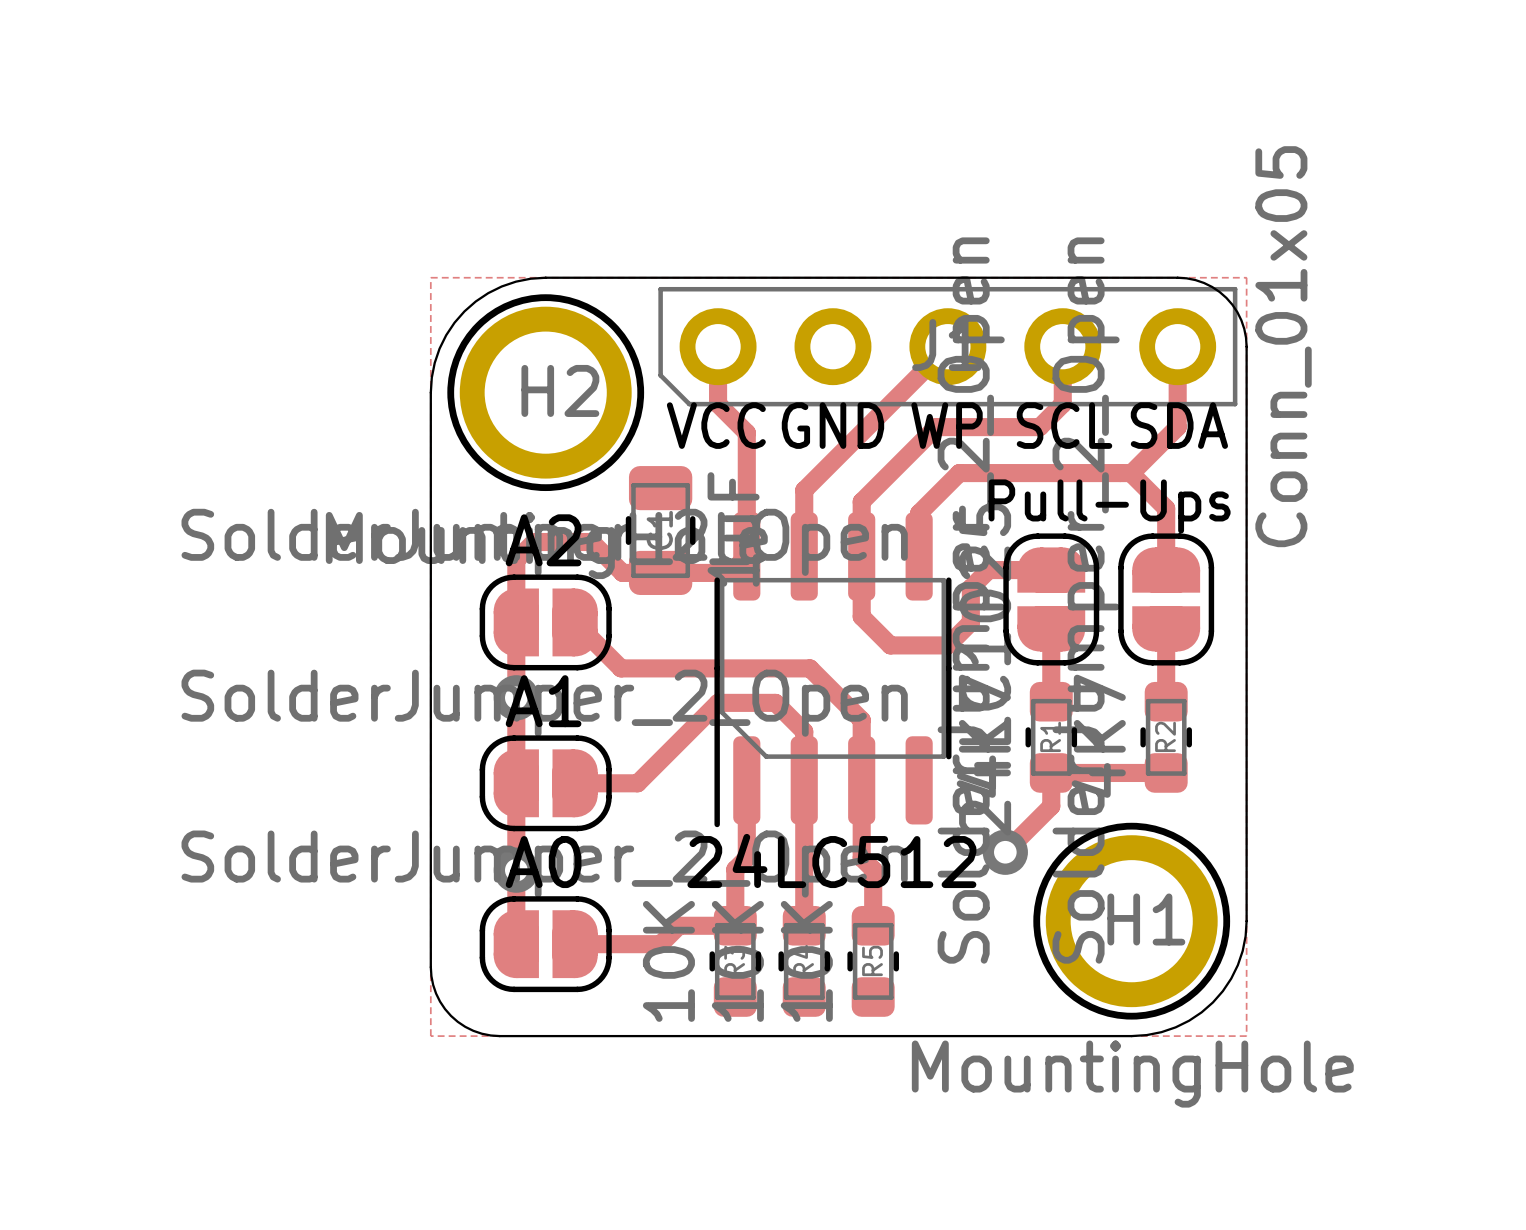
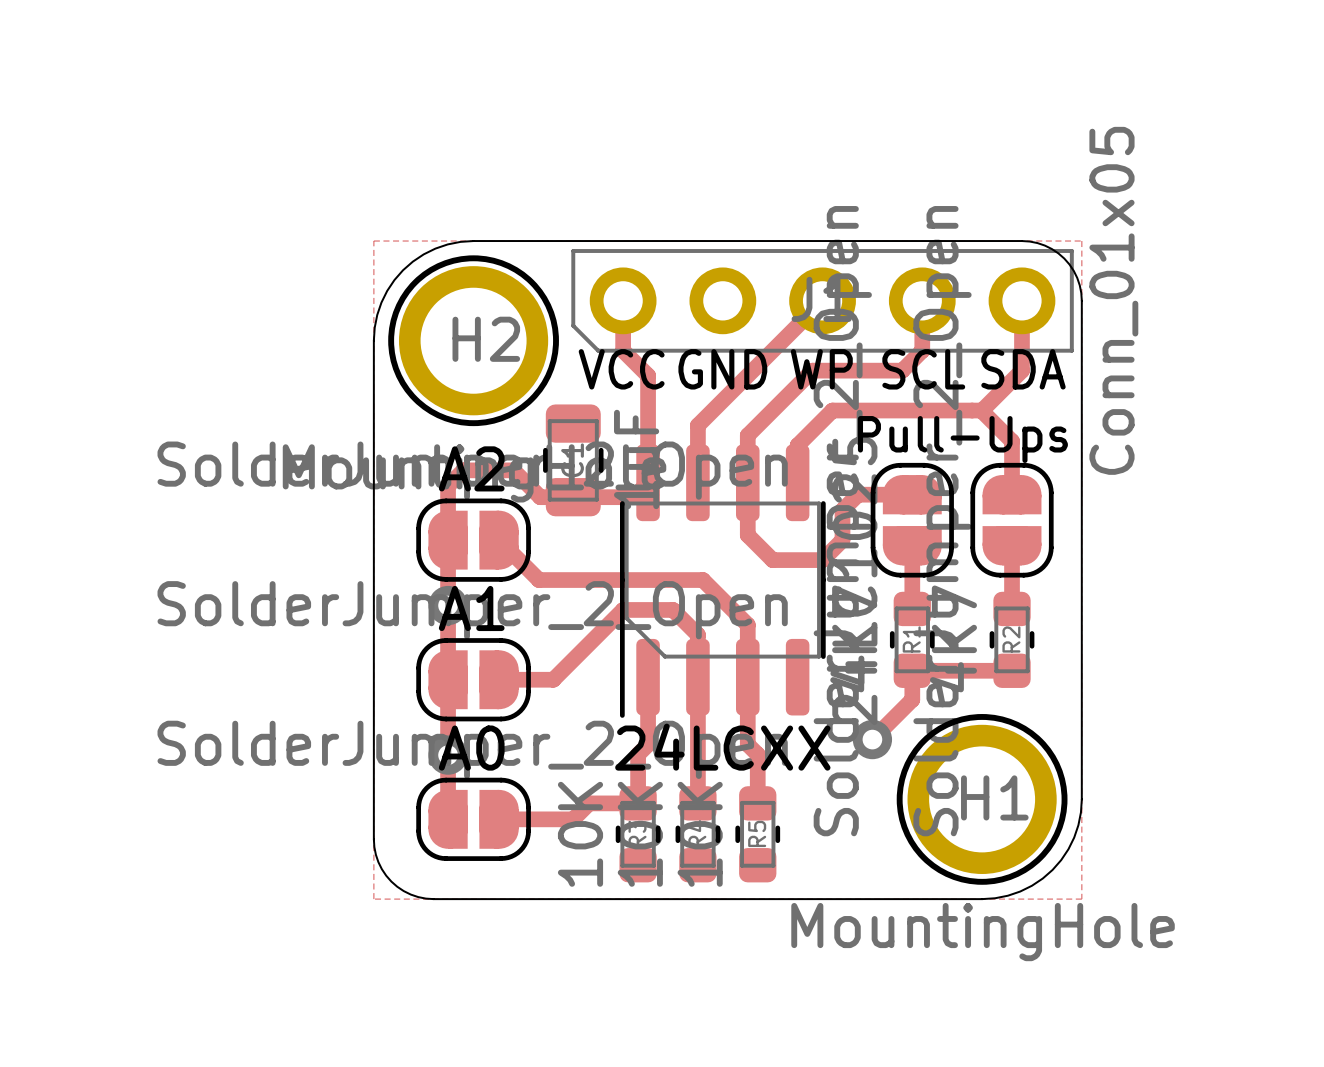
24LC512 name: 24LC512 (831, 860) -> 24LCXX (722, 747)

